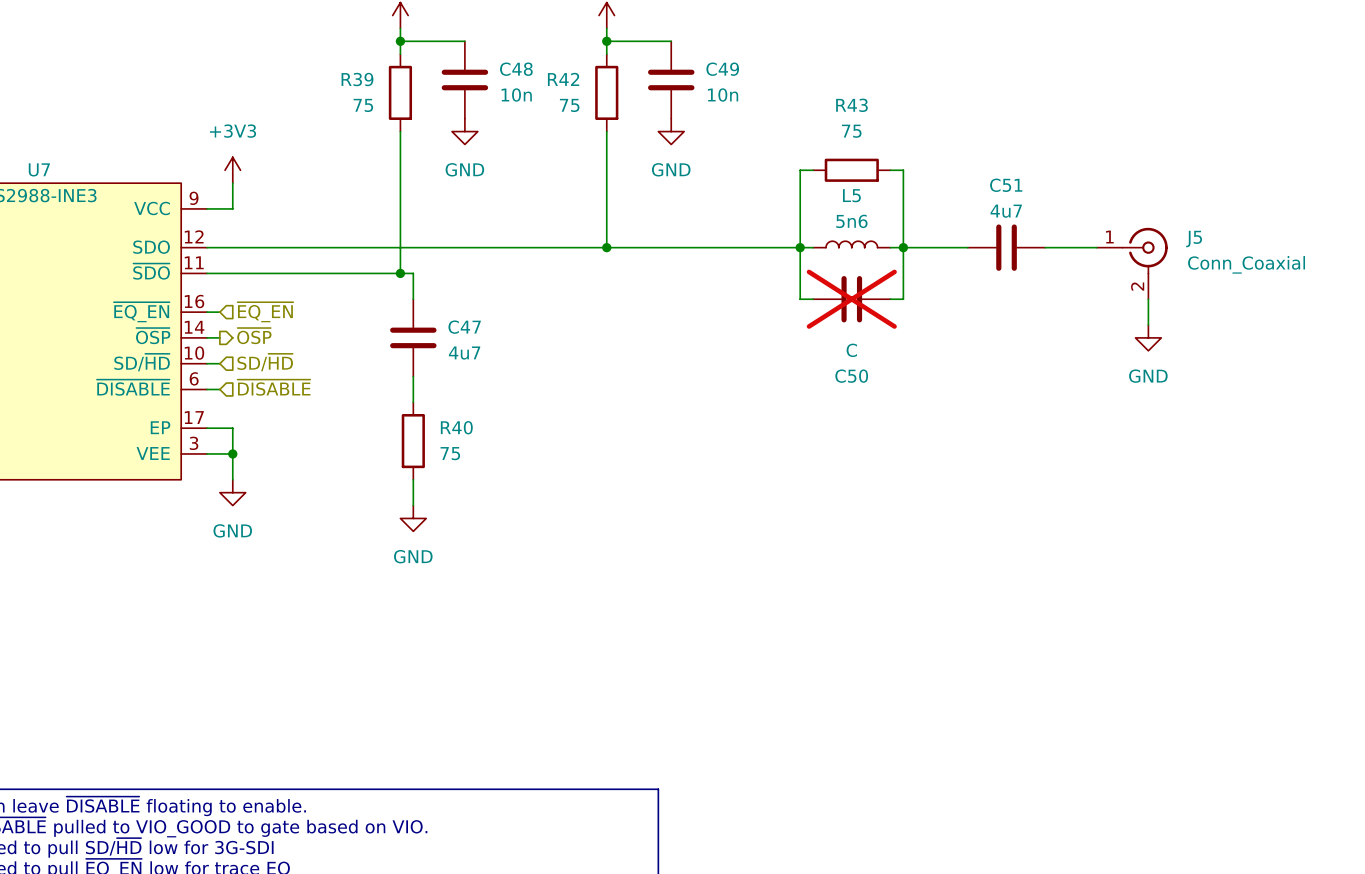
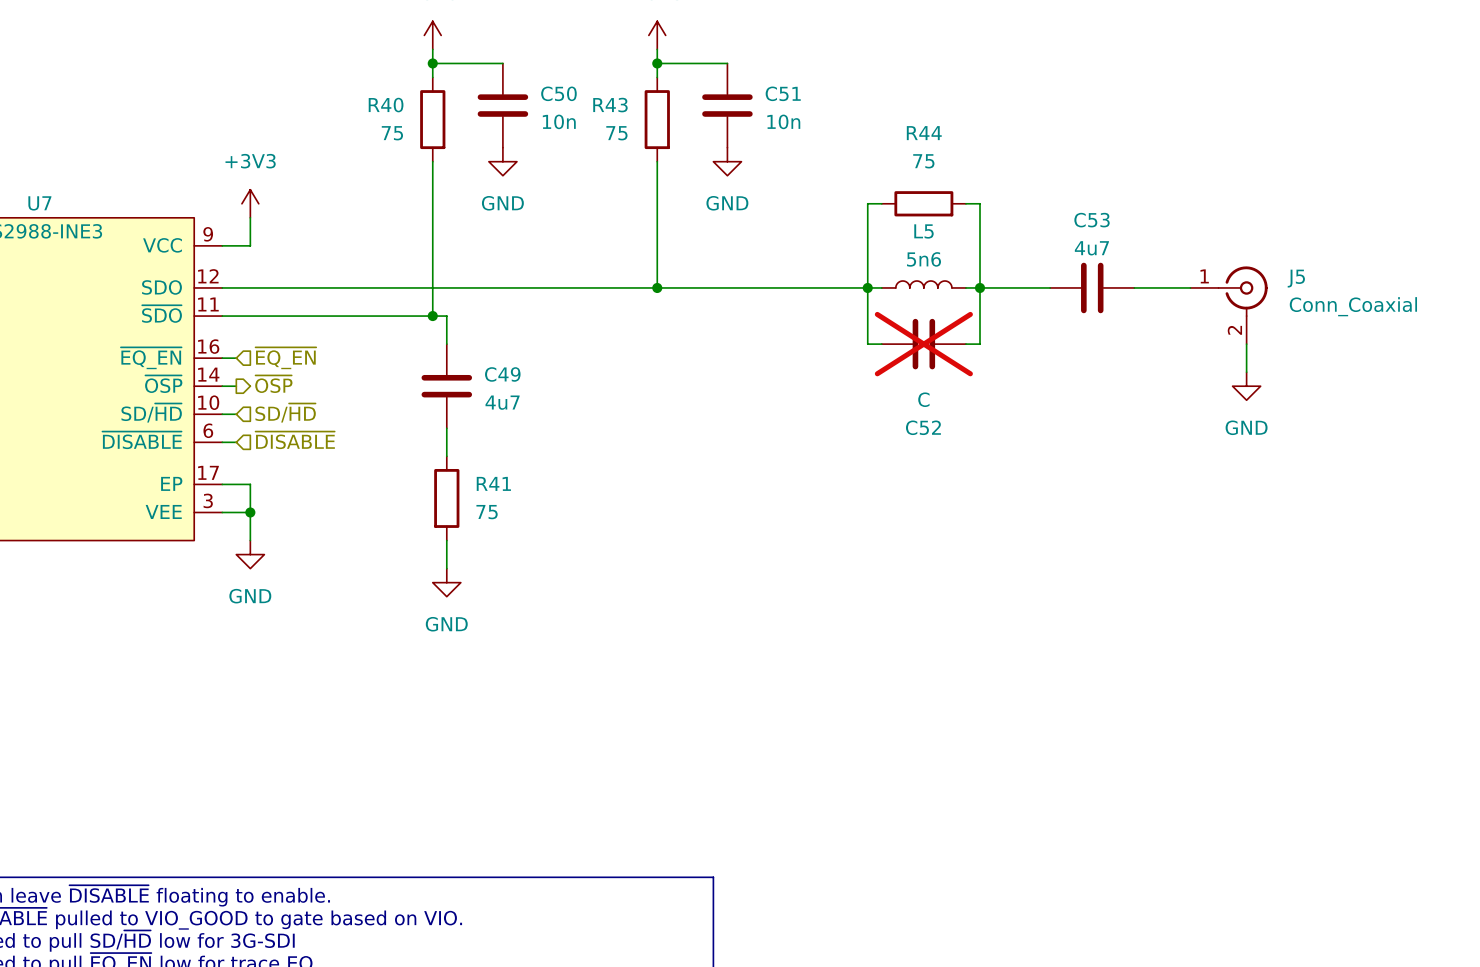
C48 name: C48 (516, 69) -> C50 (558, 93)
C49 name: C49 (722, 69) -> C51 (783, 93)
R39 name: R39 (357, 79) -> R40 (386, 105)
R42 name: R42 (563, 79) -> R43 (610, 105)
R43 name: R43 (851, 105) -> R44 (924, 133)
C51 name: C51 (1006, 185) -> C53 (1092, 220)
C47 name: C47 (464, 327) -> C49 (502, 374)
C50 name: C50 (851, 376) -> C52 (923, 427)
R40 name: R40 (456, 427) -> R41 (493, 483)

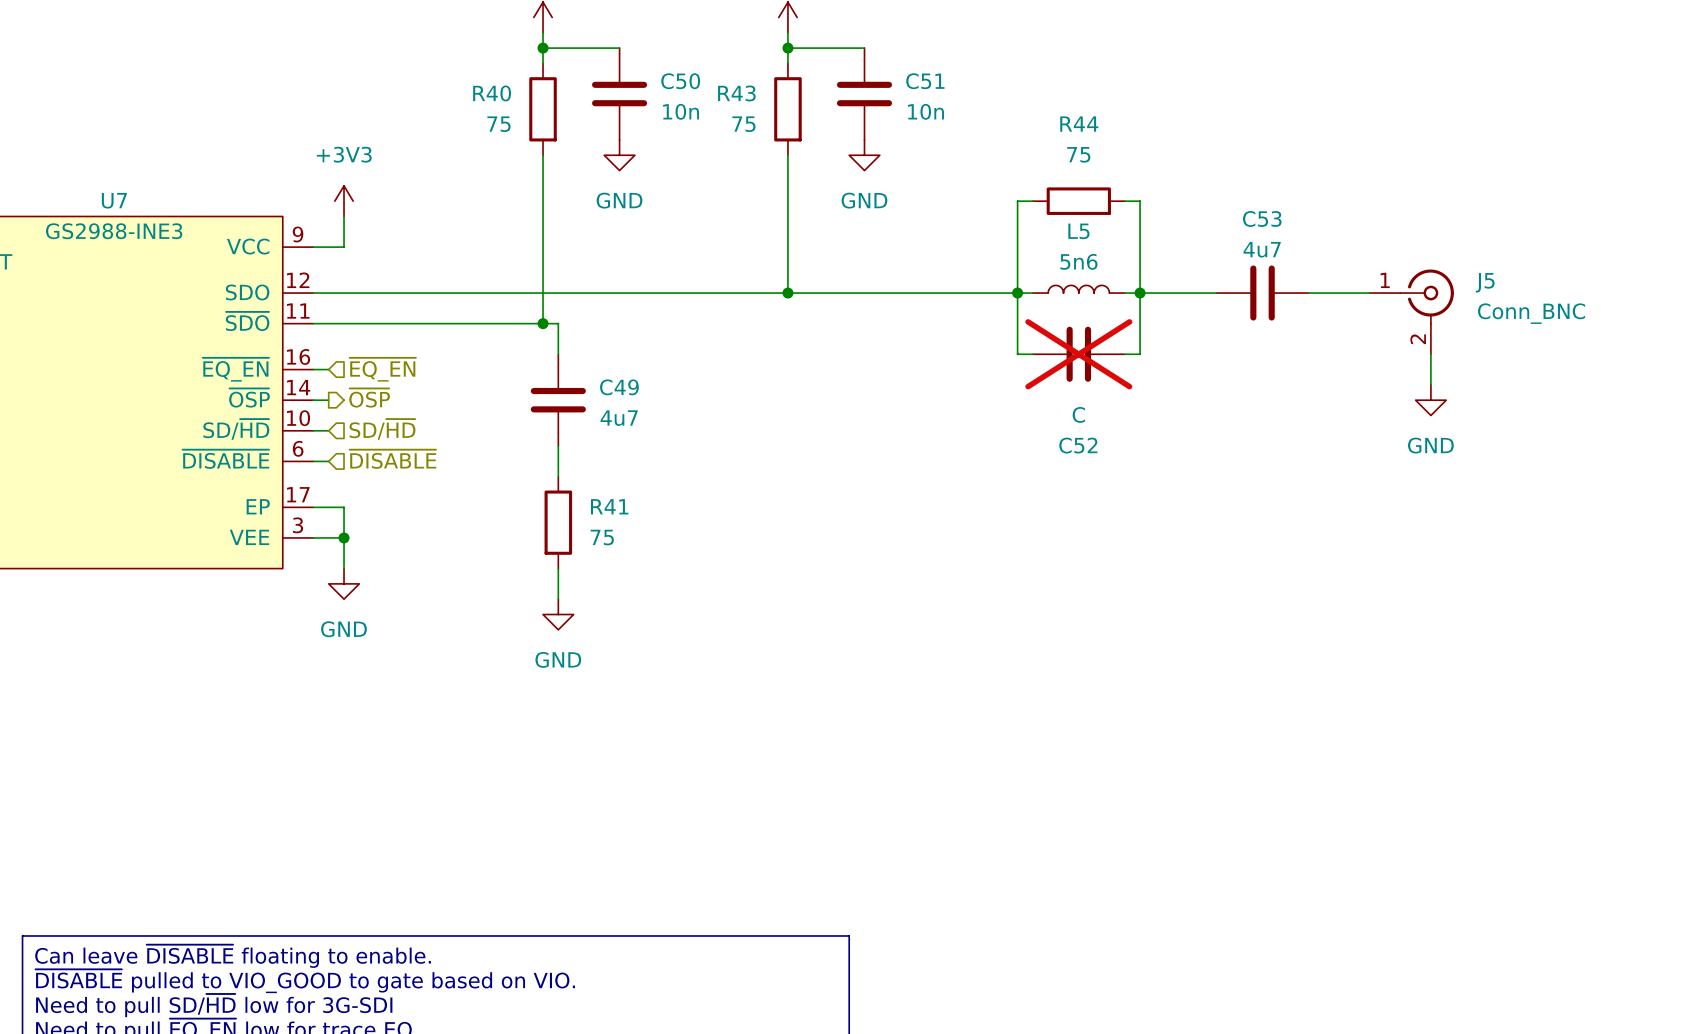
J5 value: Conn_Coaxial (1353, 306) -> Conn_BNC (1531, 313)

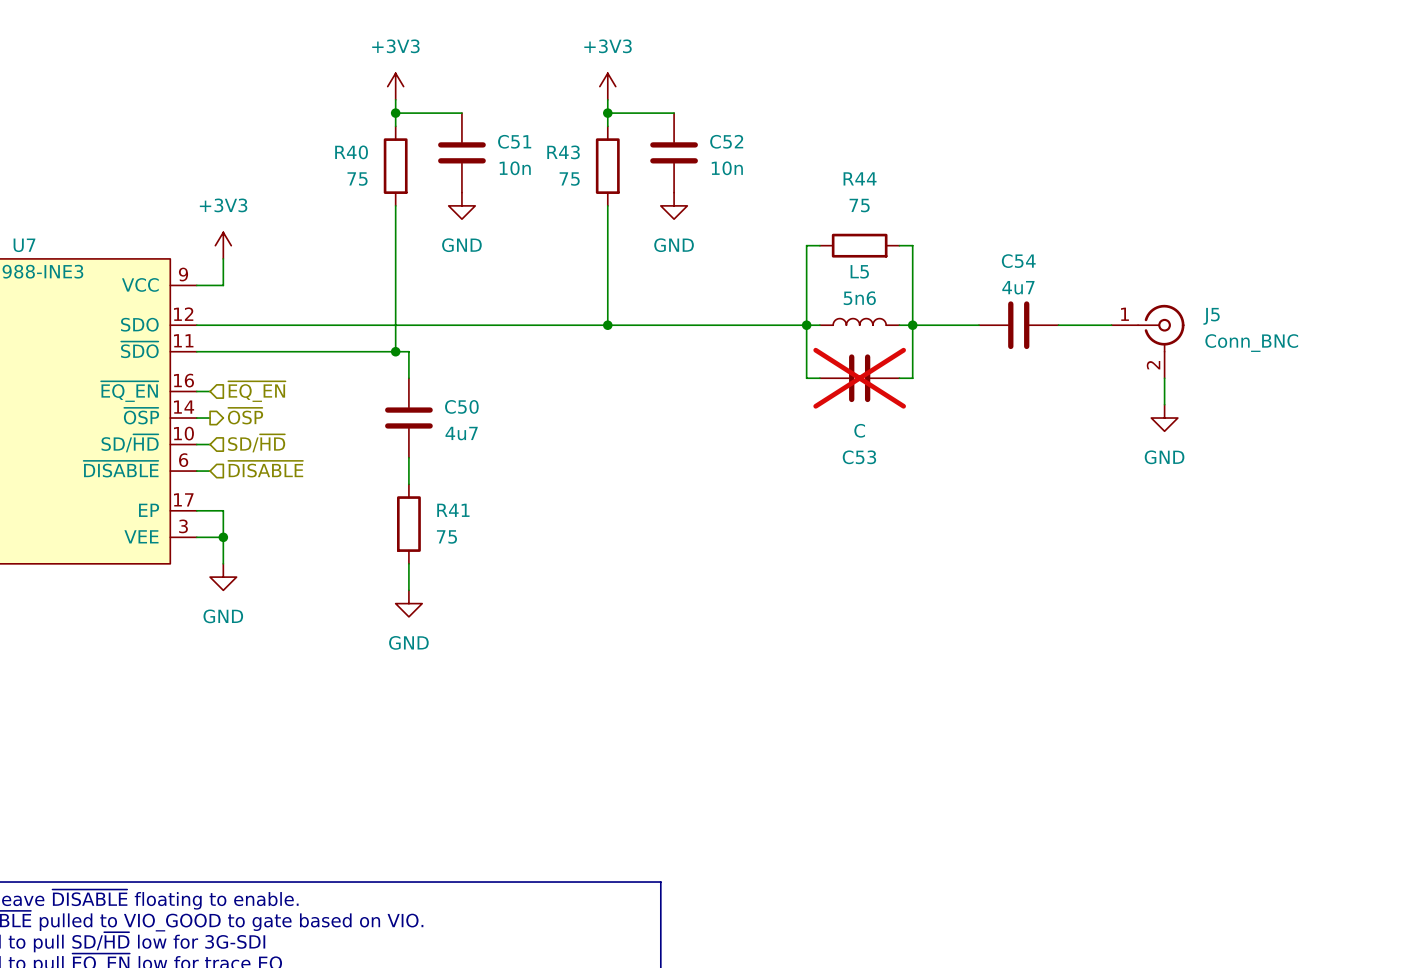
C50 name: C50 (680, 81) -> C51 (514, 141)
C51 name: C51 (925, 81) -> C52 (726, 141)
C53 name: C53 (1262, 218) -> C54 (1018, 261)
C49 name: C49 (619, 387) -> C50 (461, 406)
C52 name: C52 (1078, 445) -> C53 (859, 457)

